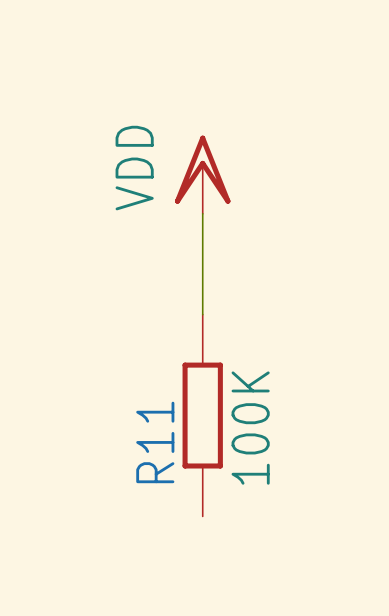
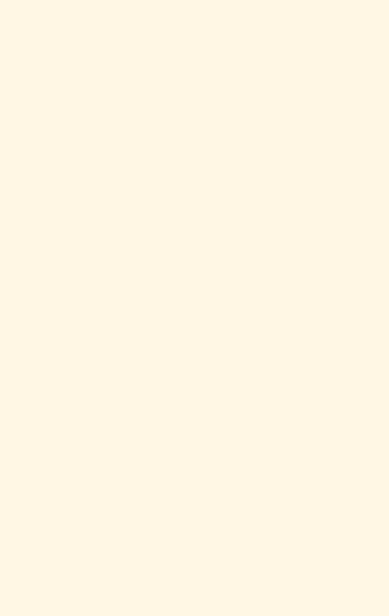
power symbol: VDD (202, 174) -> none
wire: (202, 213) (202, 314) -> none
R11: 100K (202, 415) -> none

